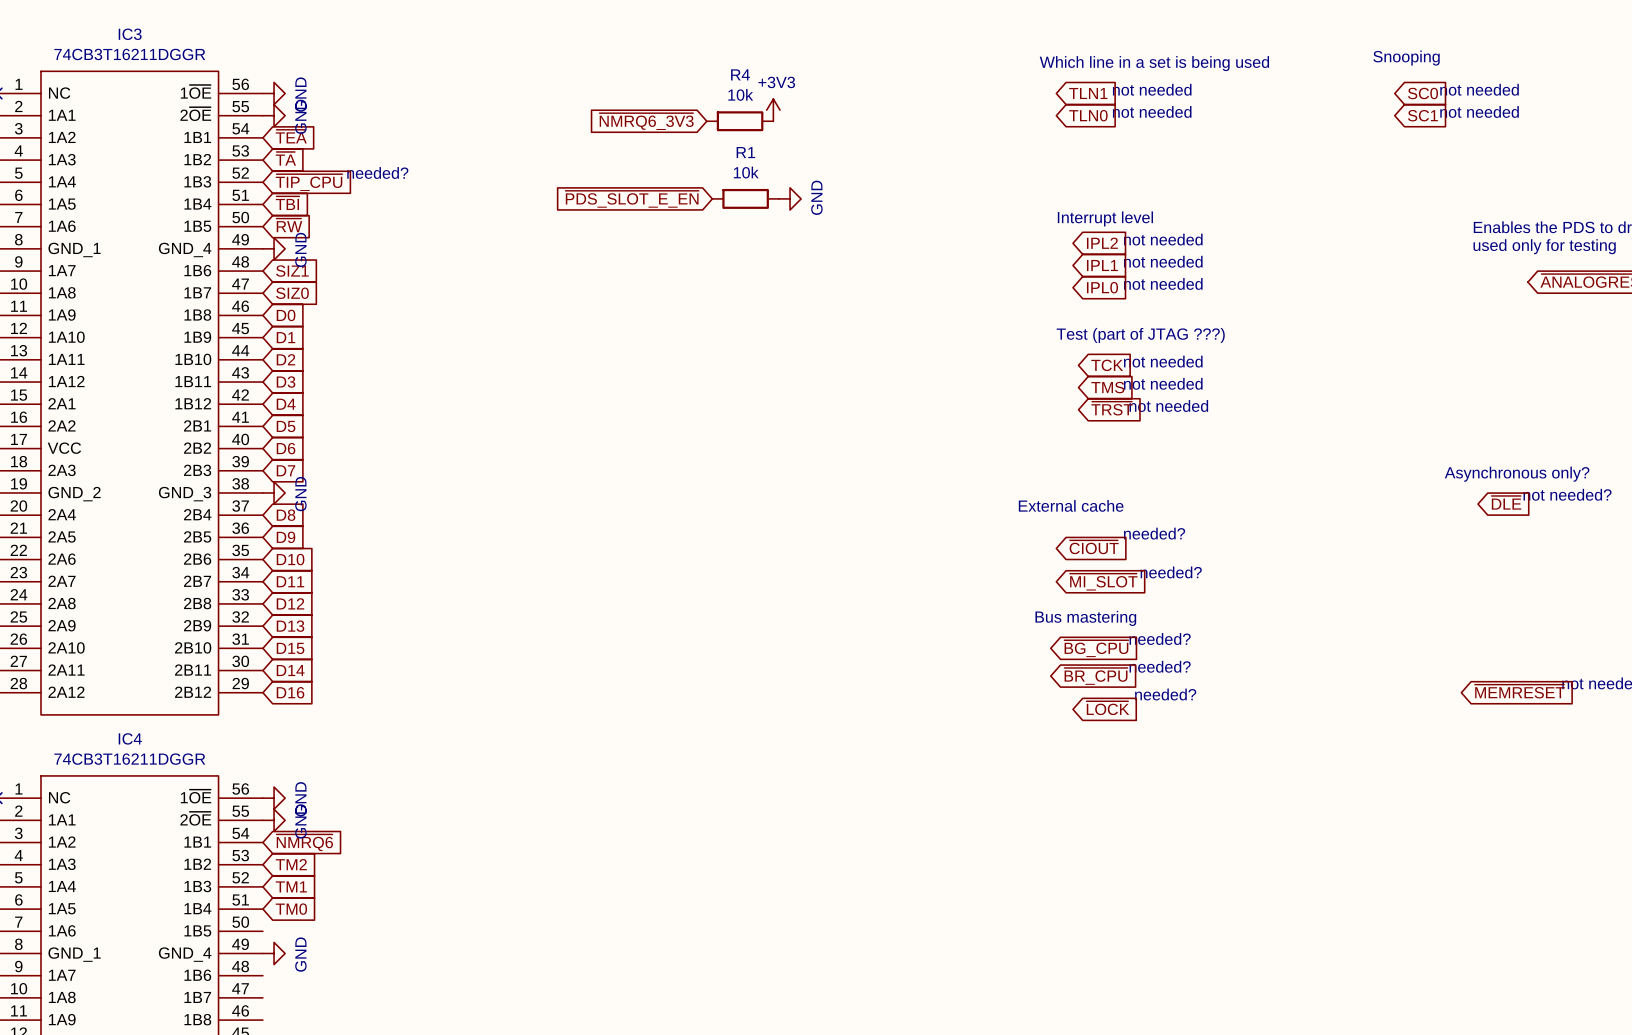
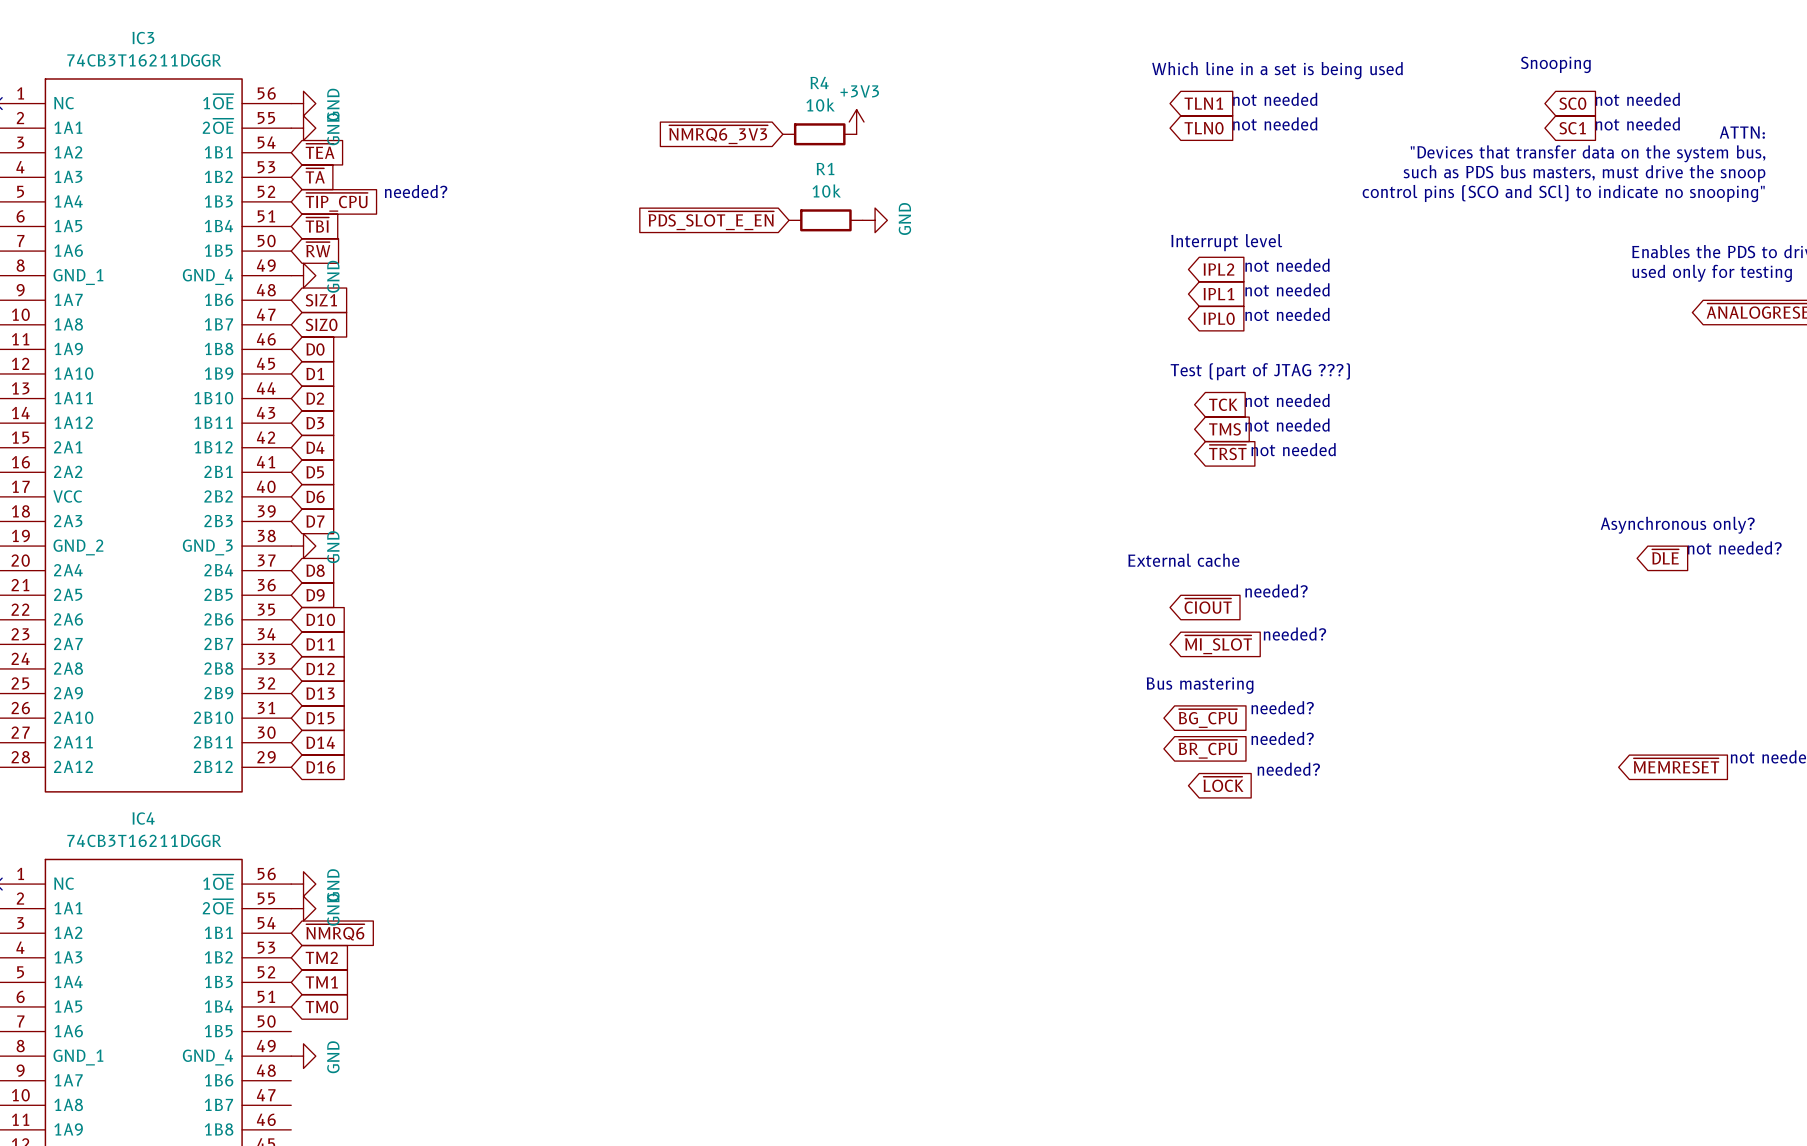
text: none -> ATTN: (1742, 132)
text: none -> "Devices that transfer data on the system bus, (1588, 153)
text: none -> such as PDS bus masters, must drive the snoop (1584, 173)
text: none -> control pins (SCO and SCl) to indicate no snooping" (1563, 193)

